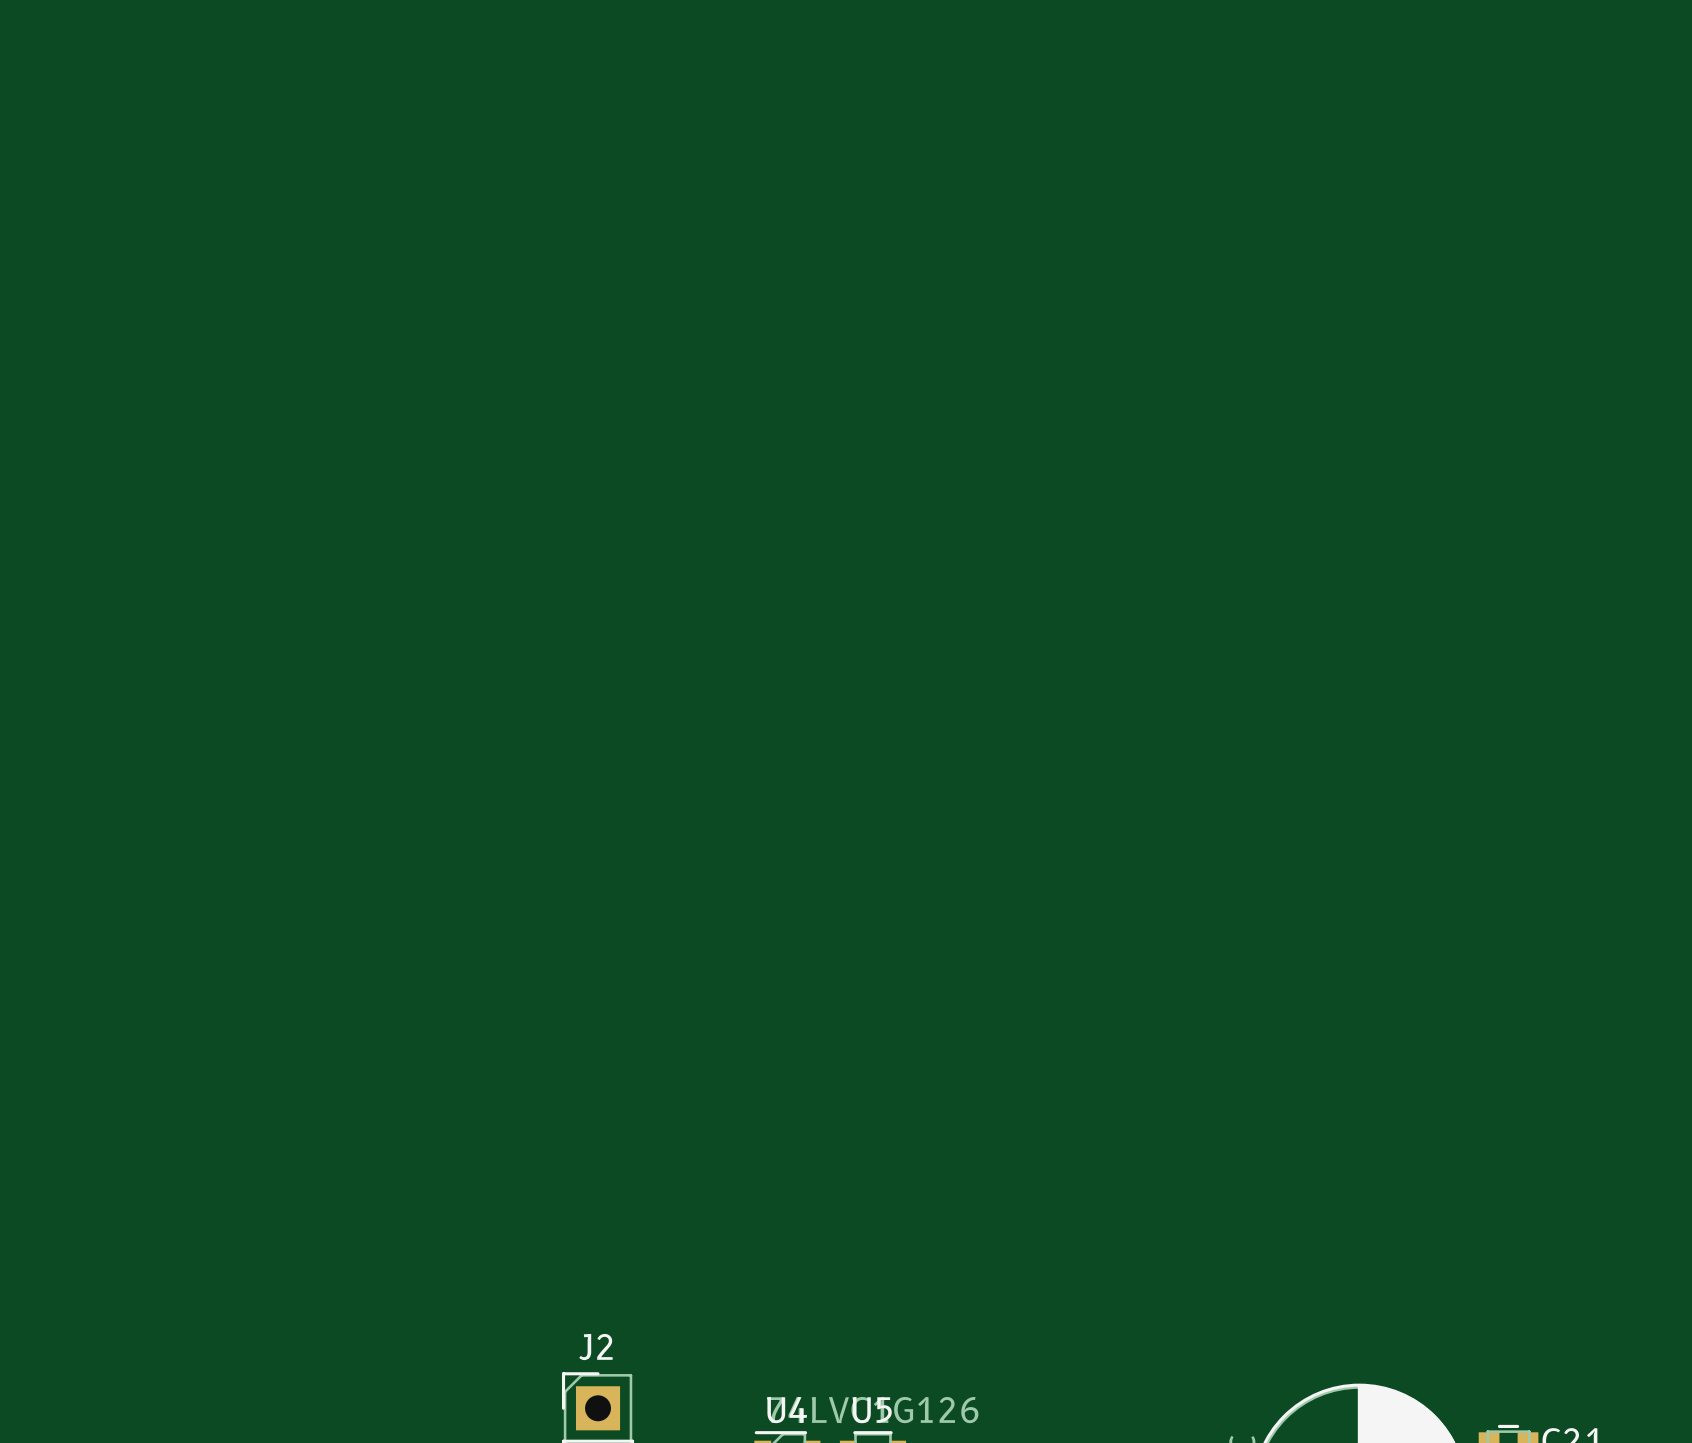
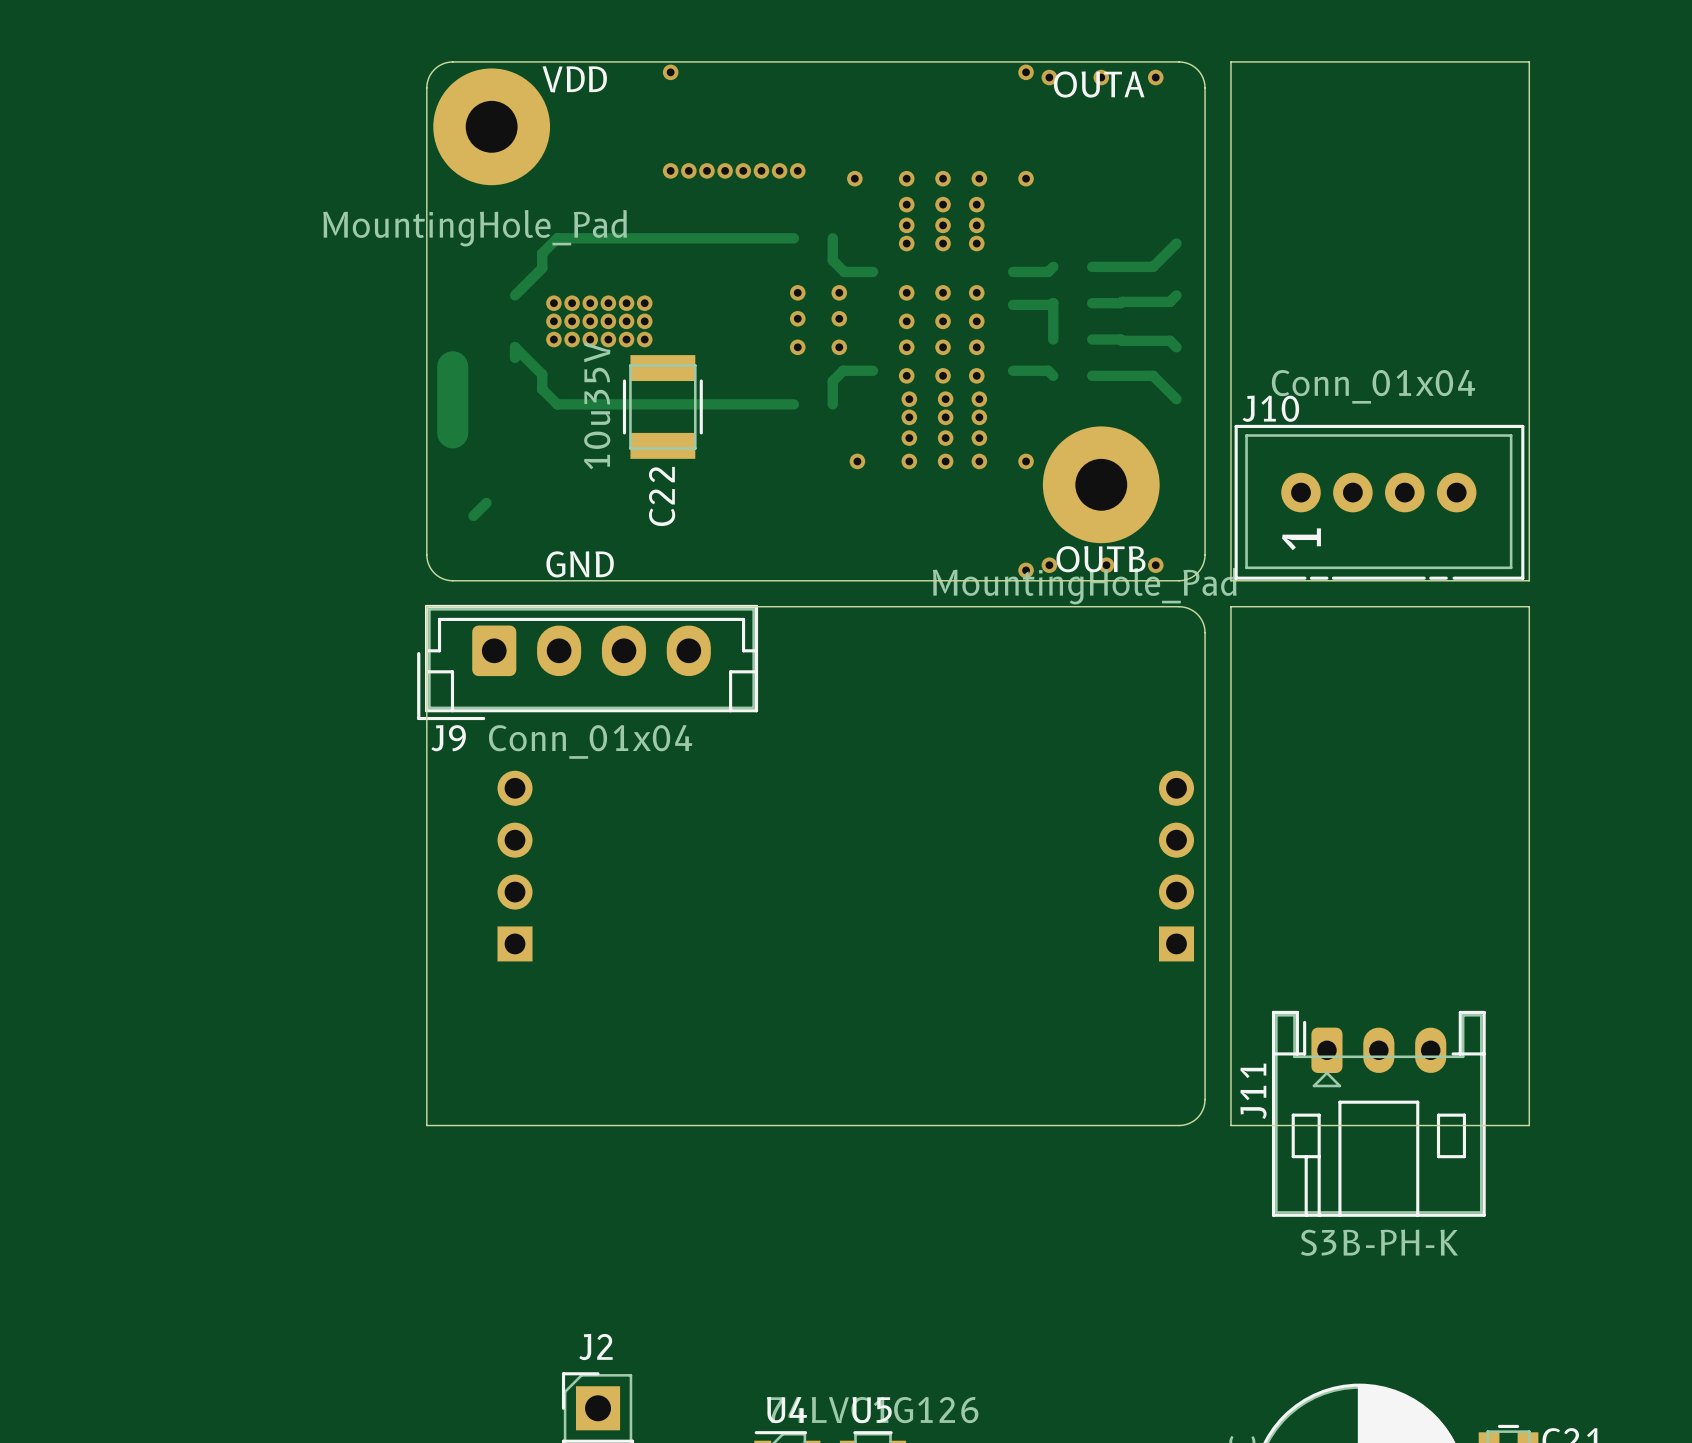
board edge: none -> (452, 61) (1179, 61) (1194, 67) (1201, 74) (1205, 87) (1205, 554) (1199, 570) (1189, 578) (1179, 580) (452, 580) (436, 575) (428, 564) (426, 554) (426, 87) (428, 77) (434, 69) (442, 63) (452, 61)
board edge: none -> (1230, 61) (1529, 61) (1529, 580) (1230, 580) (1230, 61)
via: none -> (670, 72)
via: none -> (1026, 72)
via: none -> (1049, 77)
via: none -> (1101, 77)
via: none -> (1155, 77)
text: none -> VDD (574, 79)
text: none -> OUTA (1099, 84)
part: none -> MountingHole_Pad (491, 126)
via: none -> (670, 170)
via: none -> (688, 170)
via: none -> (706, 170)
via: none -> (725, 170)
via: none -> (743, 170)
via: none -> (761, 170)
via: none -> (779, 170)
via: none -> (797, 170)
via: none -> (854, 178)
via: none -> (906, 178)
via: none -> (943, 178)
via: none -> (979, 178)
via: none -> (1026, 178)
via: none -> (906, 204)
via: none -> (943, 204)
via: none -> (976, 204)
via: none -> (906, 225)
via: none -> (943, 225)
via: none -> (976, 225)
track: none -> (793, 238) (557, 238) (542, 253) (542, 268) (515, 295)
track: none -> (832, 238) (832, 260) (844, 271) (872, 271)
via: none -> (906, 243)
via: none -> (943, 243)
via: none -> (976, 243)
track: none -> (1176, 243) (1153, 266) (1092, 266)
track: none -> (1053, 266) (1048, 271) (1013, 271)
via: none -> (797, 292)
via: none -> (839, 292)
via: none -> (906, 292)
via: none -> (943, 292)
via: none -> (976, 292)
track: none -> (1176, 295) (1170, 301) (1092, 303)
via: none -> (553, 303)
via: none -> (572, 303)
via: none -> (590, 303)
via: none -> (608, 303)
via: none -> (626, 303)
via: none -> (644, 303)
track: none -> (1013, 304) (1051, 304) (1053, 303) (1053, 339)
via: none -> (797, 318)
via: none -> (839, 318)
via: none -> (553, 321)
via: none -> (572, 321)
via: none -> (590, 321)
via: none -> (608, 321)
via: none -> (626, 321)
via: none -> (644, 321)
via: none -> (906, 321)
via: none -> (943, 321)
via: none -> (976, 321)
via: none -> (553, 339)
via: none -> (572, 339)
via: none -> (590, 339)
via: none -> (608, 339)
via: none -> (626, 339)
via: none -> (644, 339)
track: none -> (1092, 339) (1170, 340) (1176, 347)
via: none -> (797, 347)
via: none -> (839, 347)
via: none -> (906, 347)
via: none -> (943, 347)
via: none -> (976, 347)
track: none -> (515, 357) (515, 347) (542, 374) (542, 389) (557, 404) (793, 404)
track: none -> (452, 366) (452, 432)
track: none -> (872, 370) (843, 370) (832, 381) (832, 404)
track: none -> (1013, 370) (1048, 370) (1053, 375)
via: none -> (906, 375)
via: none -> (943, 375)
via: none -> (976, 375)
track: none -> (1092, 375) (1153, 375) (1176, 399)
via: none -> (909, 399)
via: none -> (945, 399)
via: none -> (979, 399)
C22: none -> 10u35V (662, 406)
via: none -> (909, 417)
via: none -> (945, 417)
via: none -> (979, 417)
via: none -> (909, 438)
via: none -> (945, 438)
via: none -> (979, 438)
via: none -> (857, 461)
via: none -> (909, 461)
via: none -> (945, 461)
via: none -> (979, 461)
via: none -> (1026, 461)
part: none -> MountingHole_Pad (1101, 484)
track: none -> (486, 502) (473, 515)
J10: none -> Conn_01x04 (1379, 502)
text: none -> OUTB (1100, 559)
text: none -> GND (580, 564)
via: none -> (1049, 565)
via: none -> (1106, 565)
via: none -> (1155, 565)
via: none -> (1026, 570)
board edge: none -> (426, 606) (426, 1125) (1179, 1125) (1192, 1122) (1201, 1112) (1205, 1099) (1205, 632) (1201, 619) (1192, 610) (1179, 606) (426, 606)
board edge: none -> (1230, 606) (1230, 1125) (1529, 1125) (1529, 606) (1230, 606)
J9: none -> Conn_01x04 (587, 662)
part: none -> (515, 866)
part: none -> (1176, 866)
J11: none -> S3B-PH-K (1378, 1113)

